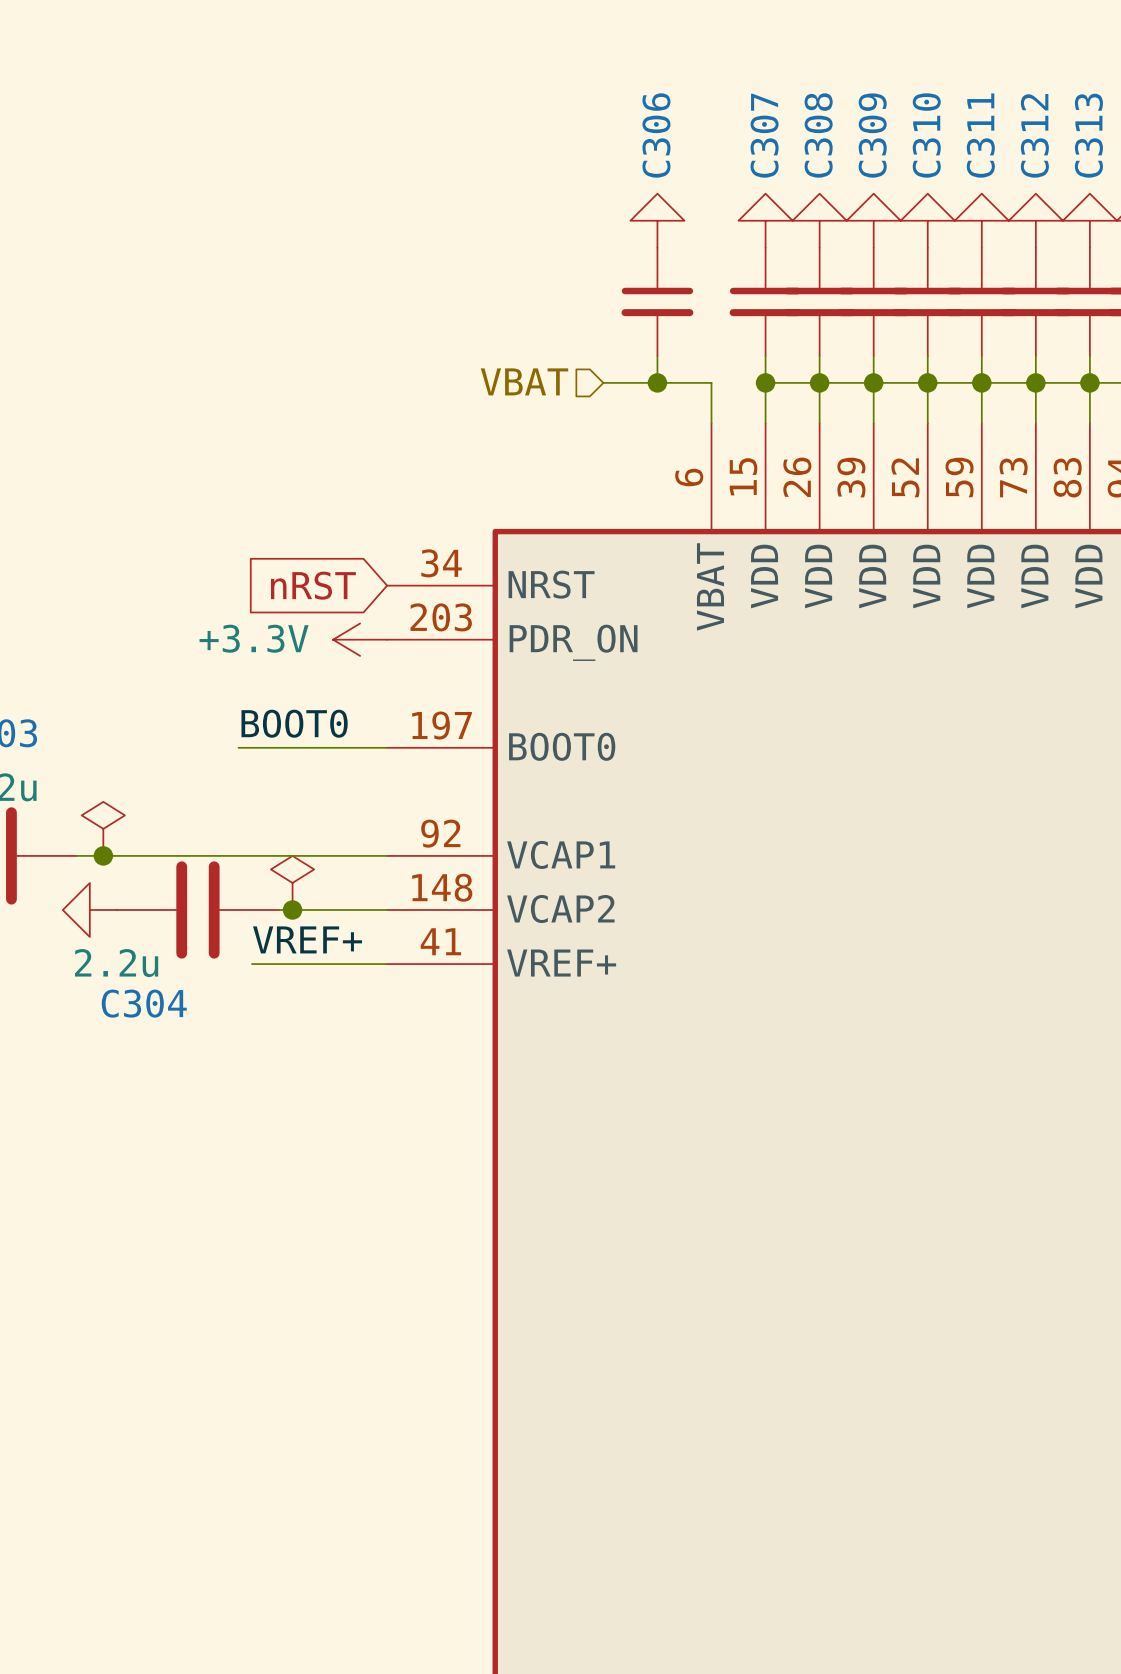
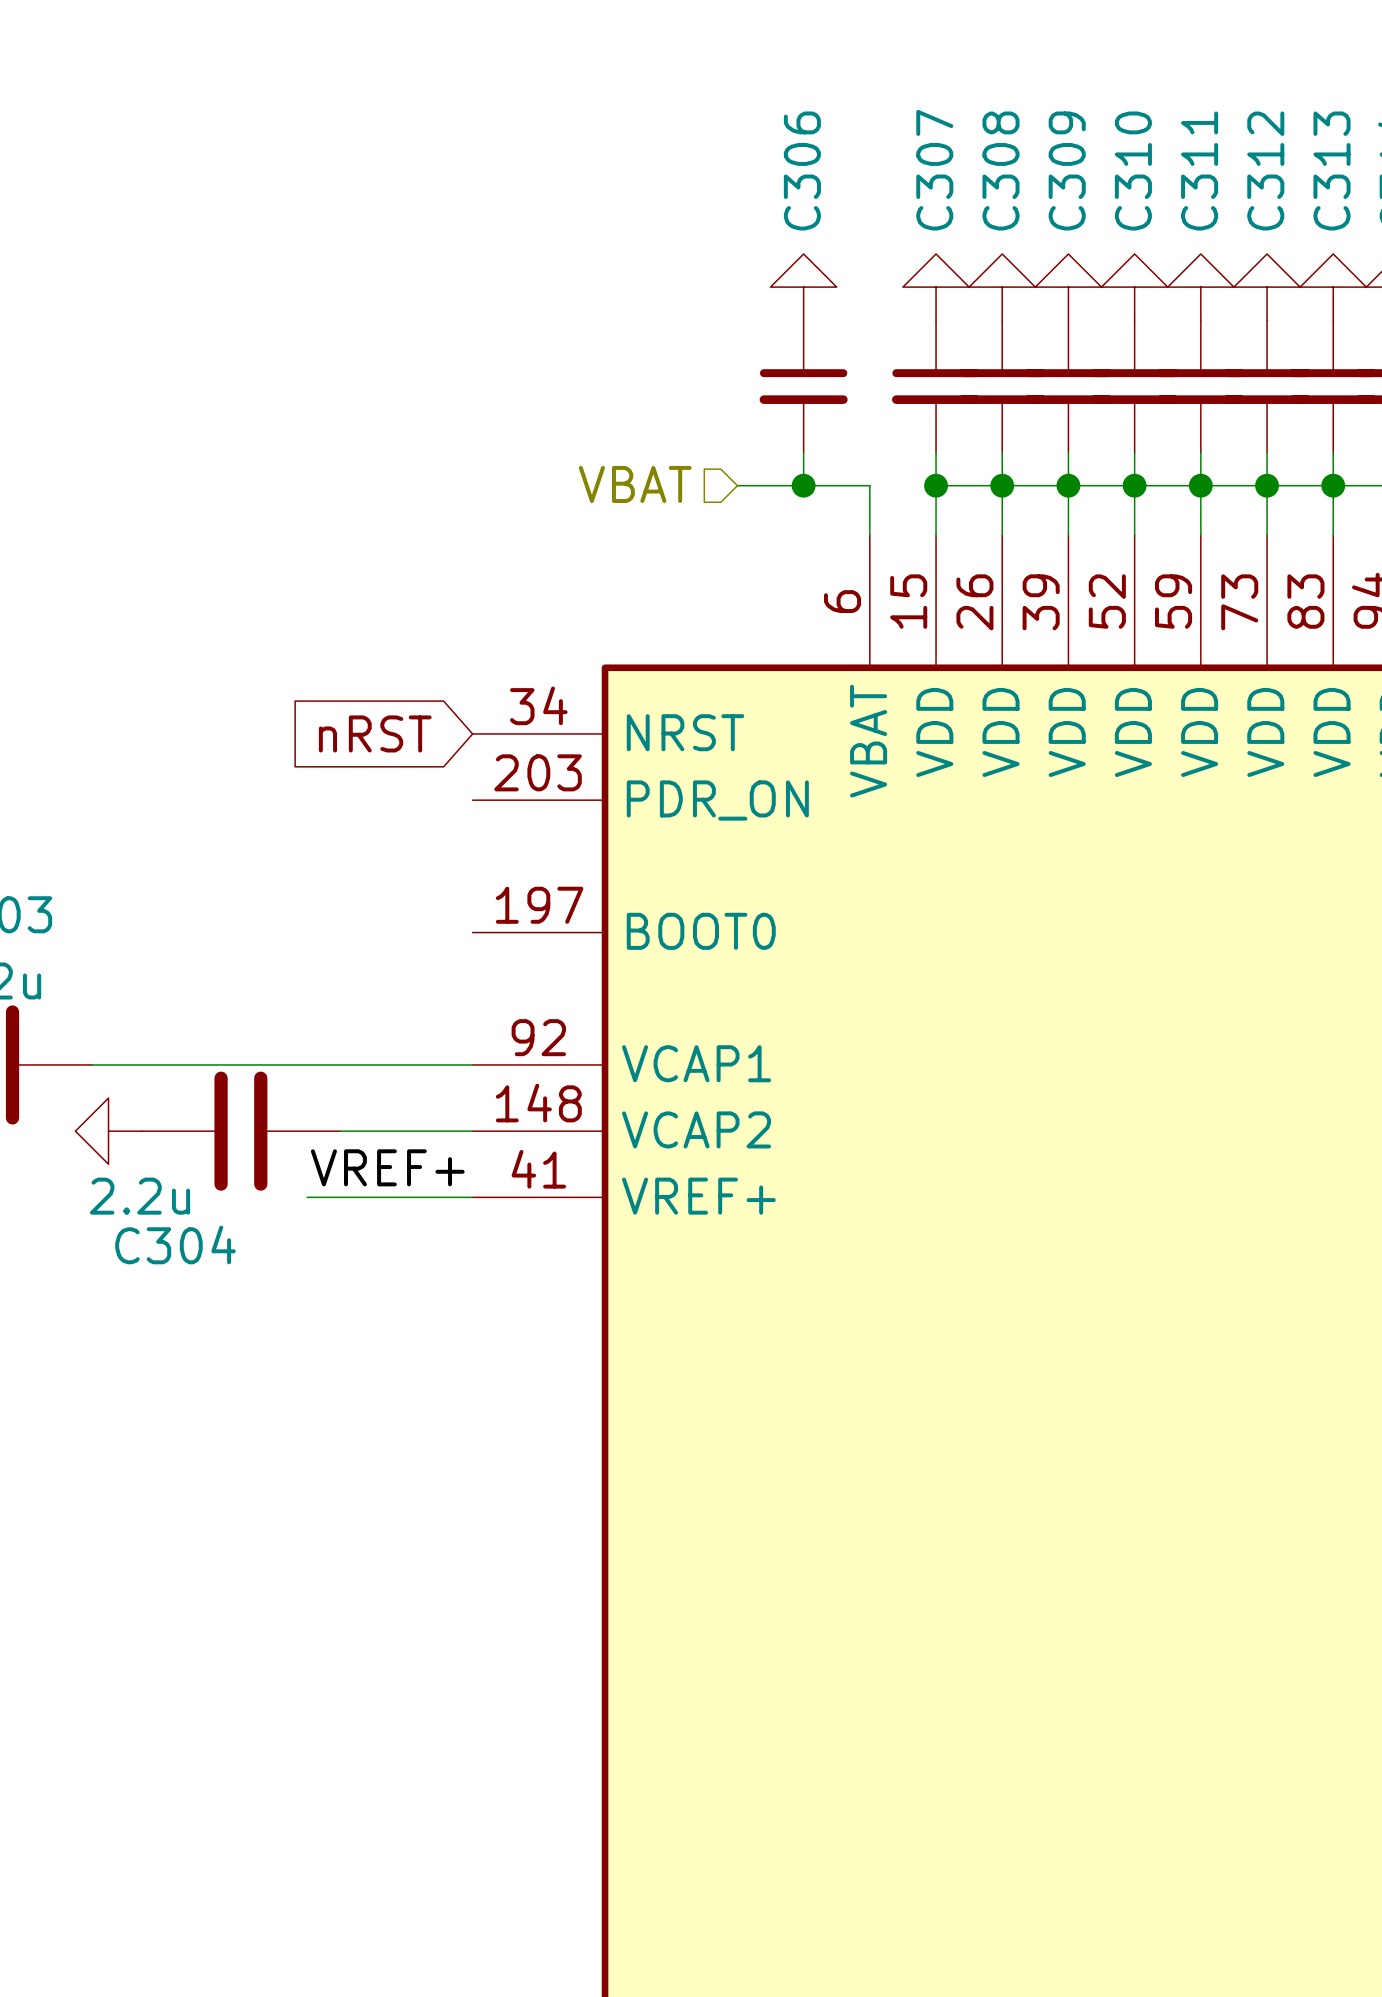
power symbol: +3.3V (360, 639) -> none
label: BOOT0 (294, 723) -> none
wire: (238, 747) (387, 747) -> none
power symbol: (103, 828) -> none
junction: (103, 855) -> none
power symbol: (292, 882) -> none
junction: (292, 909) -> none

